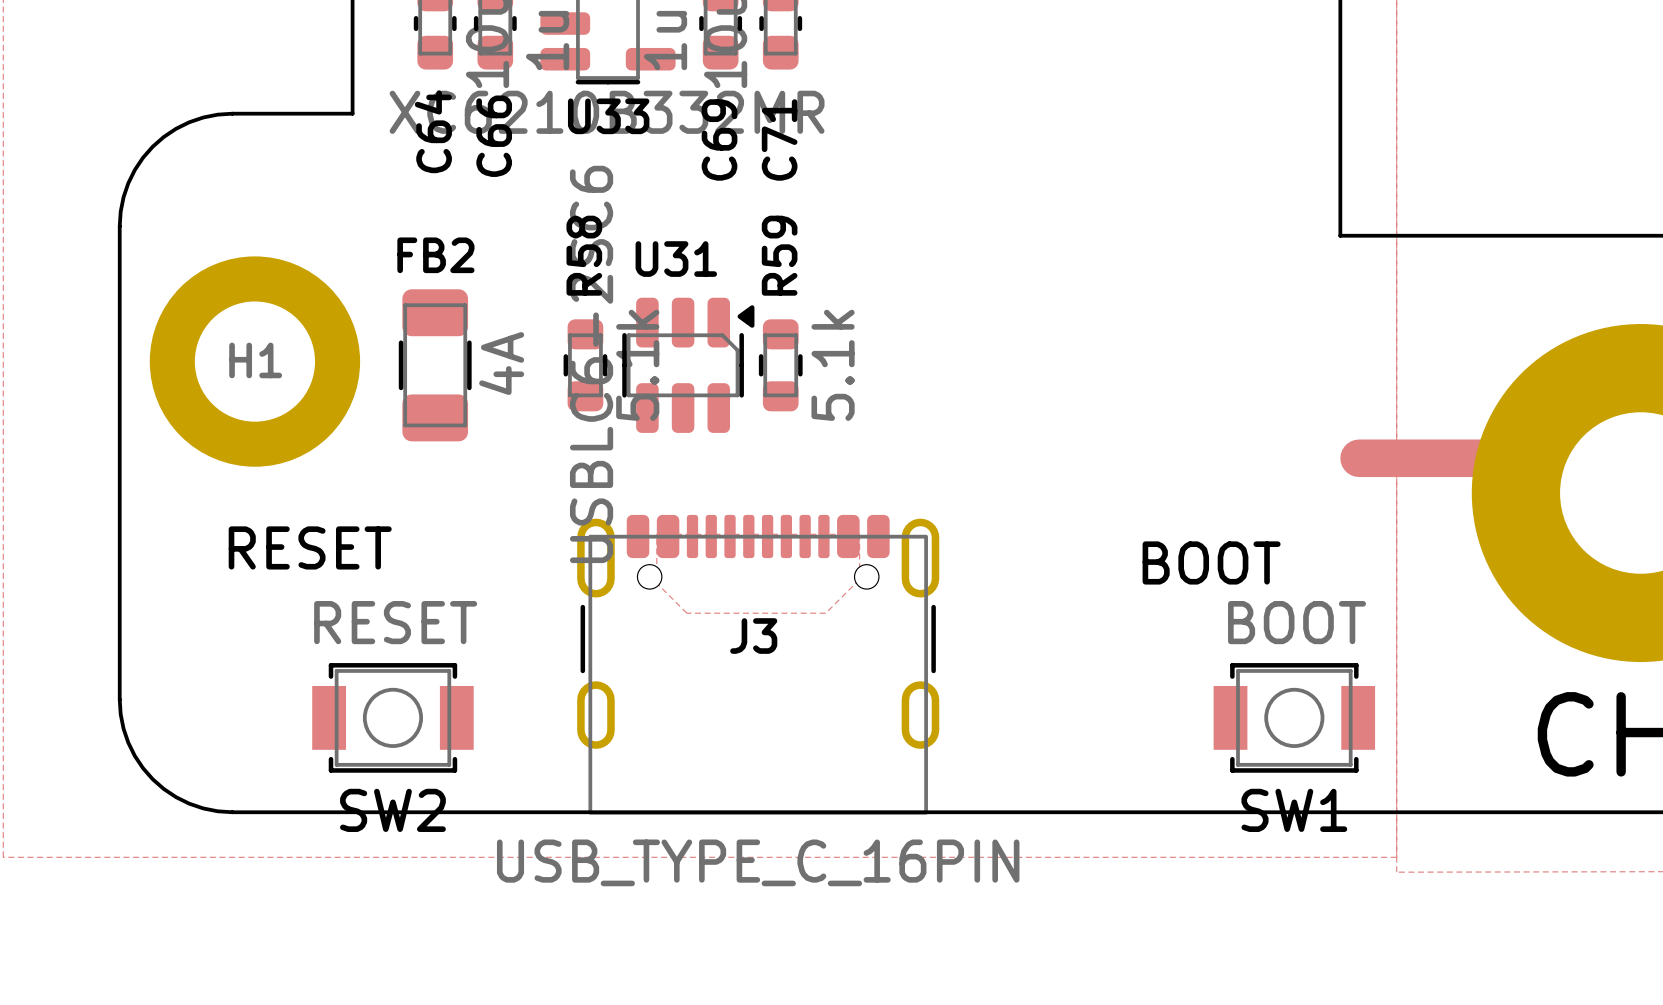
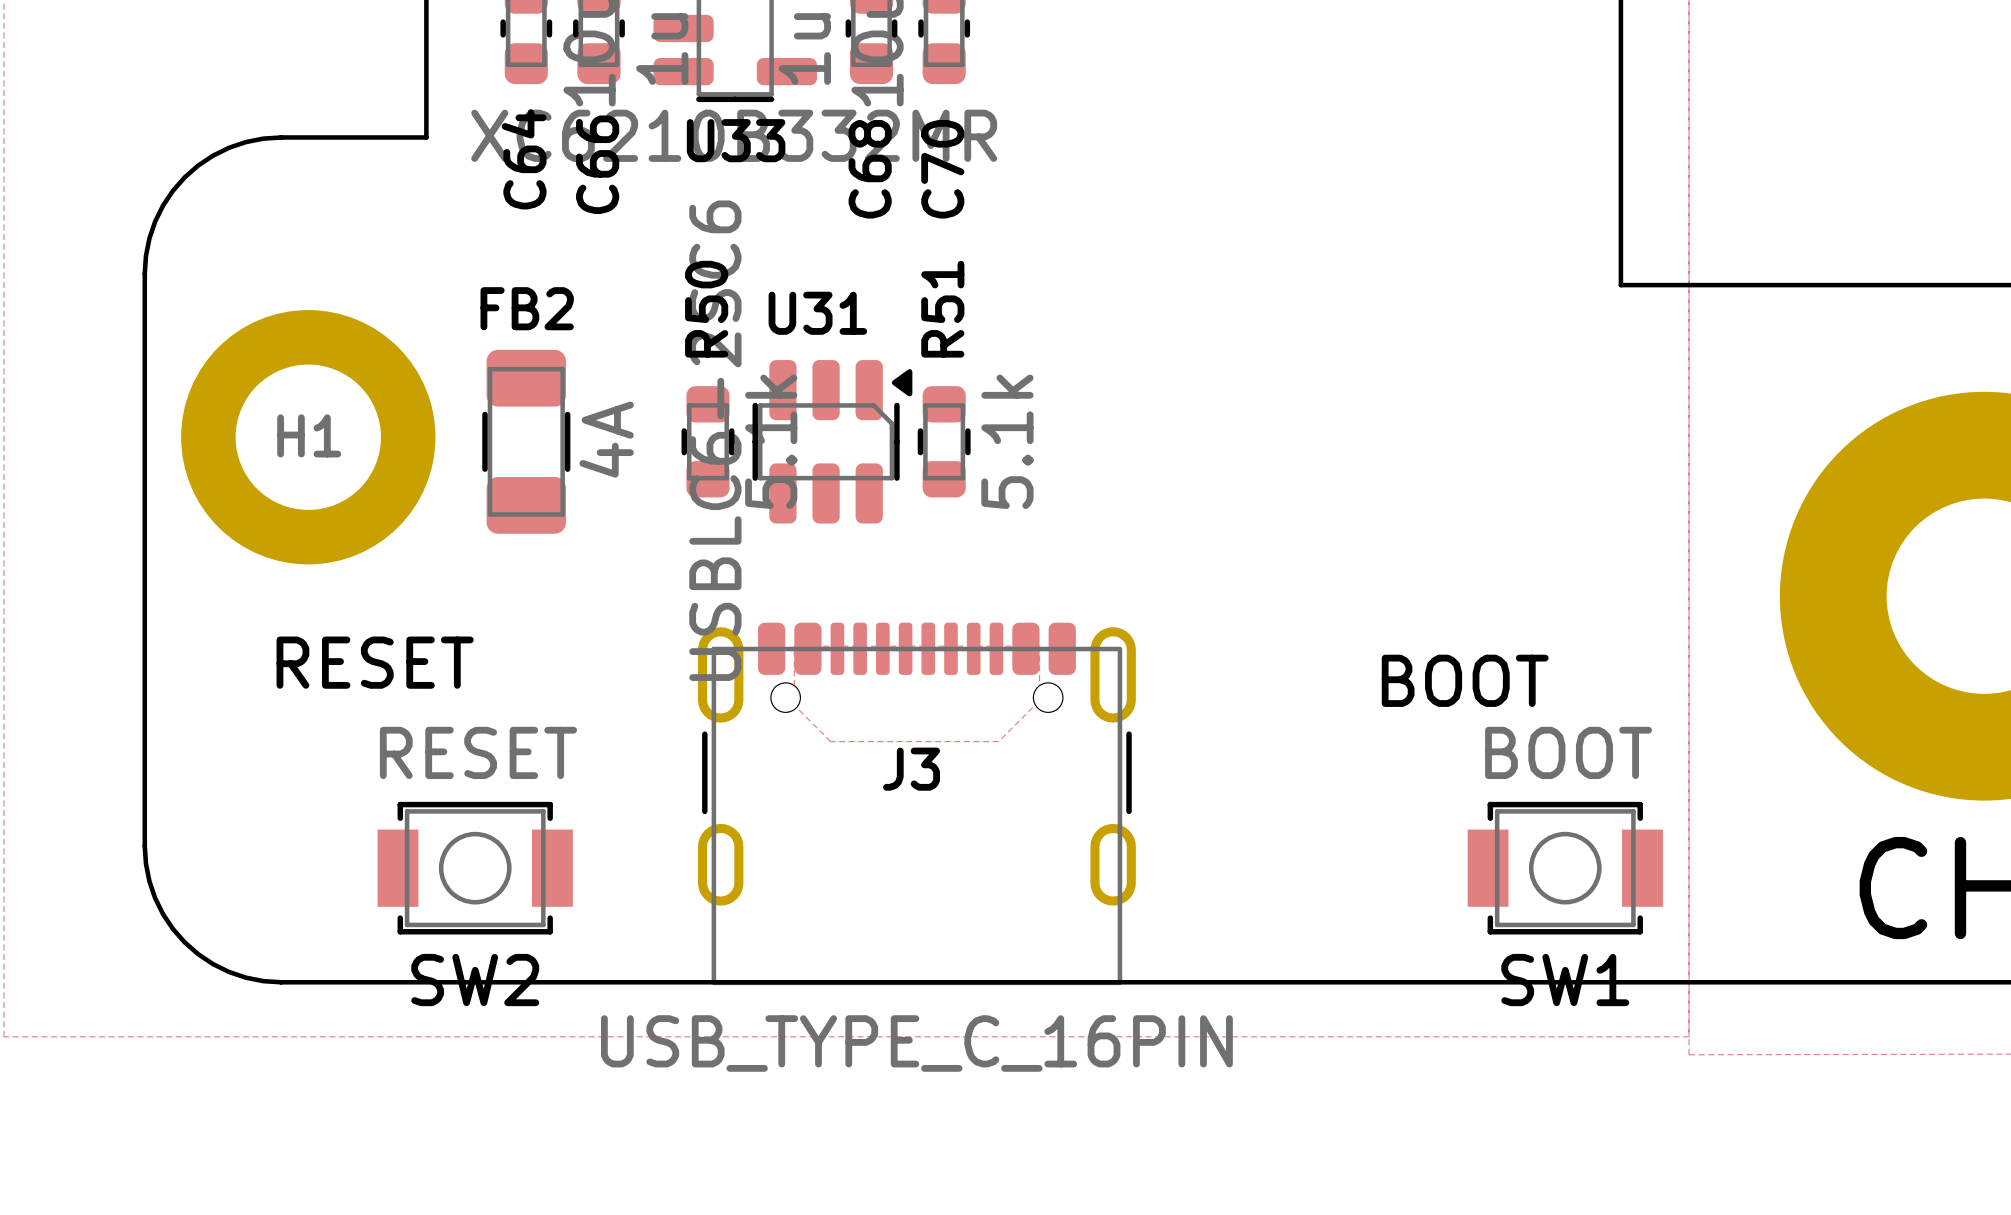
C69 name: C69 (719, 139) -> C68 (870, 169)
C71 name: C71 (779, 139) -> C70 (942, 169)
R58 name: R58 (584, 255) -> R50 (706, 309)
R59 name: R59 (779, 255) -> R51 (942, 309)
track: (1359, 458) (1606, 458) -> none

